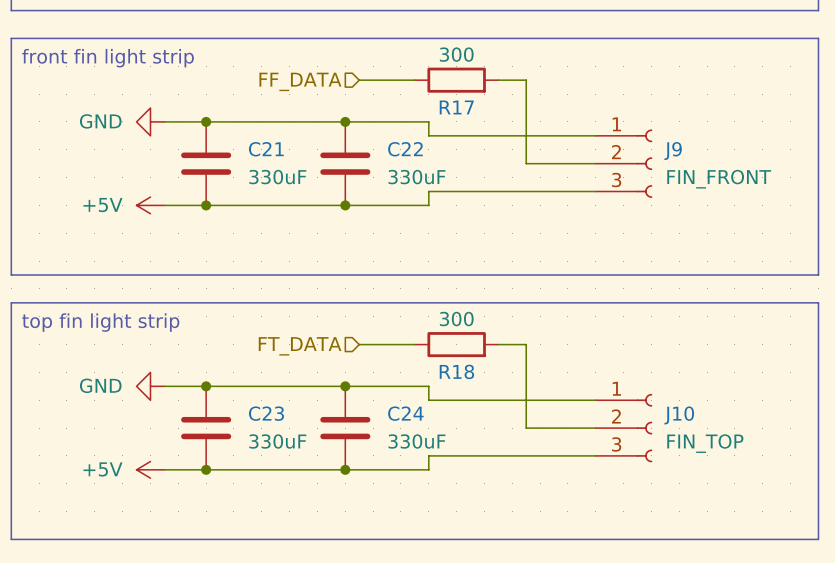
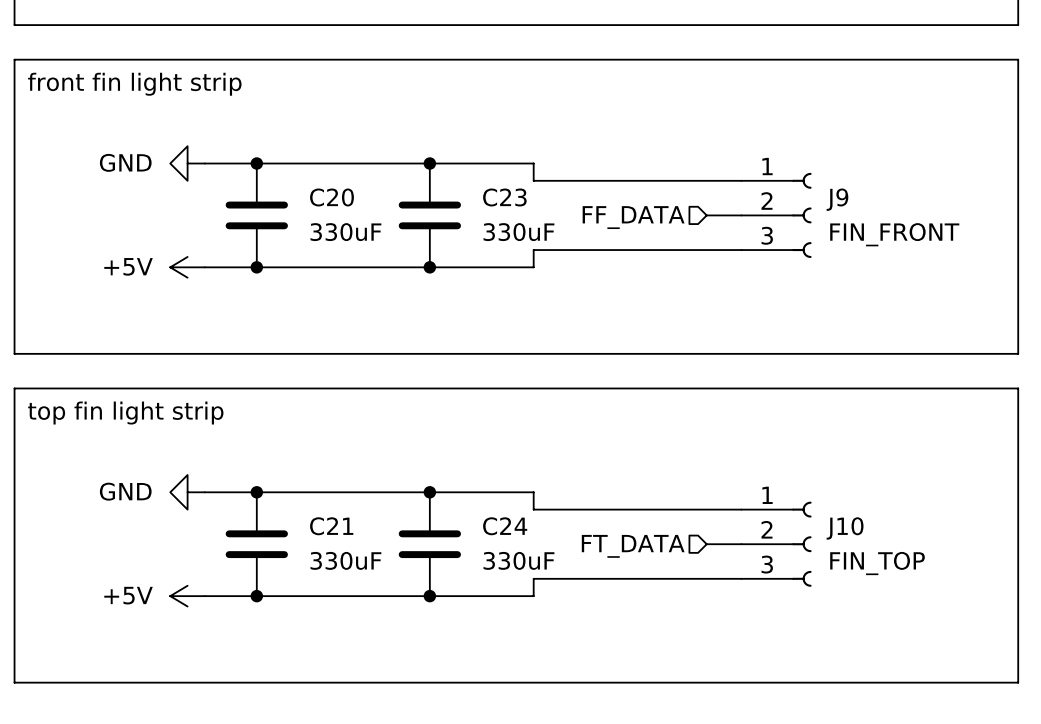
wire: (359, 80) (414, 80) -> none
R17: 300 (456, 80) -> none
wire: (498, 80) (526, 80) (526, 163) (567, 163) -> none
hierarchical label position: FF_DATA (300, 81) -> FF_DATA (633, 217)
C21 name: C21 (266, 149) -> C20 (331, 197)
C22 name: C22 (405, 149) -> C23 (504, 197)
wire: (359, 344) (414, 344) -> none
R18: 300 (456, 344) -> none
wire: (498, 344) (526, 344) (526, 428) (567, 428) -> none
hierarchical label position: FT_DATA (300, 346) -> FT_DATA (633, 546)
C23 name: C23 (266, 413) -> C21 (331, 526)

